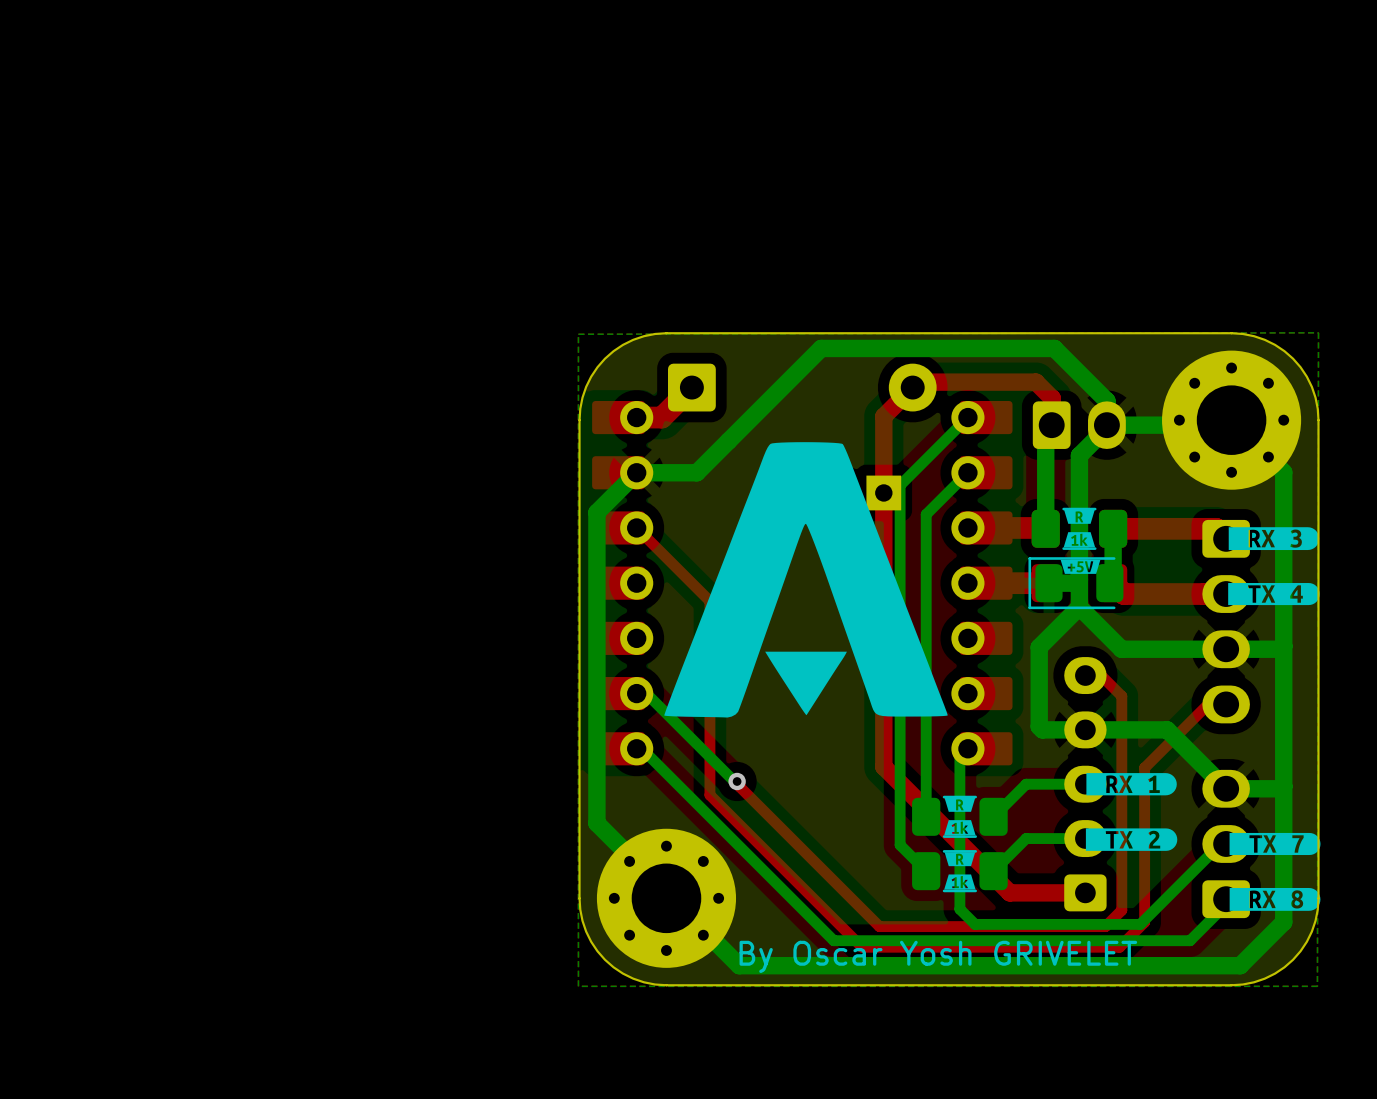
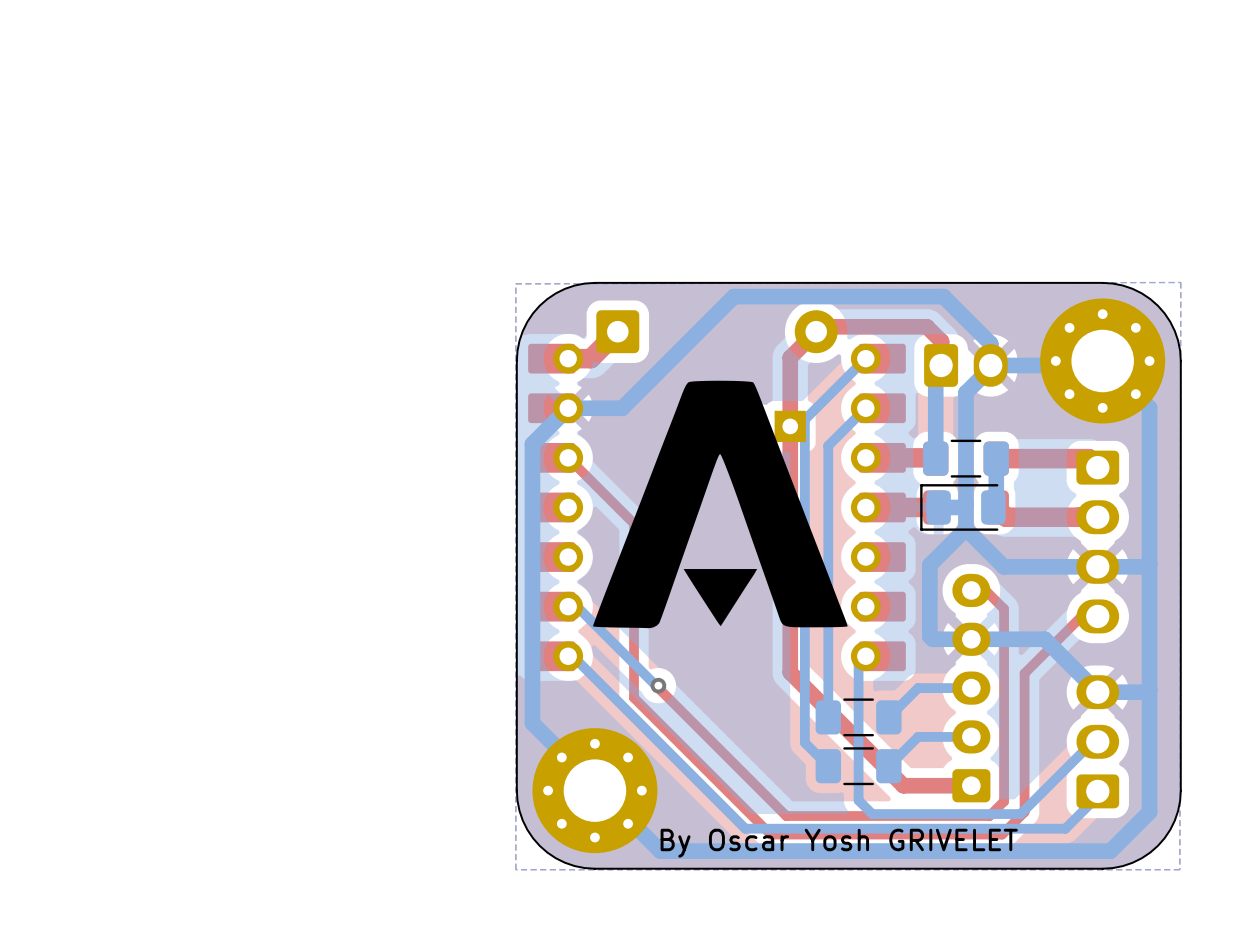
drawing: [1060, 509, 1101, 574] -> none
drawing: [1228, 527, 1320, 551] -> none
drawing: [1228, 583, 1320, 606] -> none
drawing: [1086, 773, 1177, 796] -> none
drawing: [944, 797, 976, 890] -> none
drawing: [1085, 828, 1178, 851] -> none
drawing: [1229, 832, 1321, 856] -> none
drawing: [1229, 887, 1321, 911] -> none

